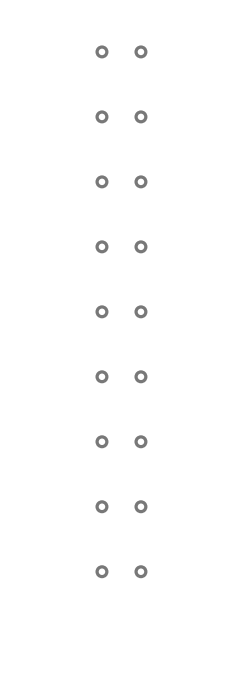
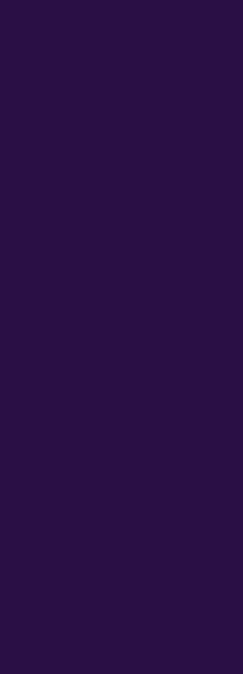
via: (101, 51) -> none
via: (140, 51) -> none
via: (101, 116) -> none
via: (140, 116) -> none
via: (101, 181) -> none
via: (140, 181) -> none
via: (101, 246) -> none
via: (140, 246) -> none
via: (101, 311) -> none
via: (140, 311) -> none
via: (101, 376) -> none
via: (140, 376) -> none
via: (101, 441) -> none
via: (140, 441) -> none
via: (101, 506) -> none
via: (140, 506) -> none
via: (101, 571) -> none
via: (140, 571) -> none

